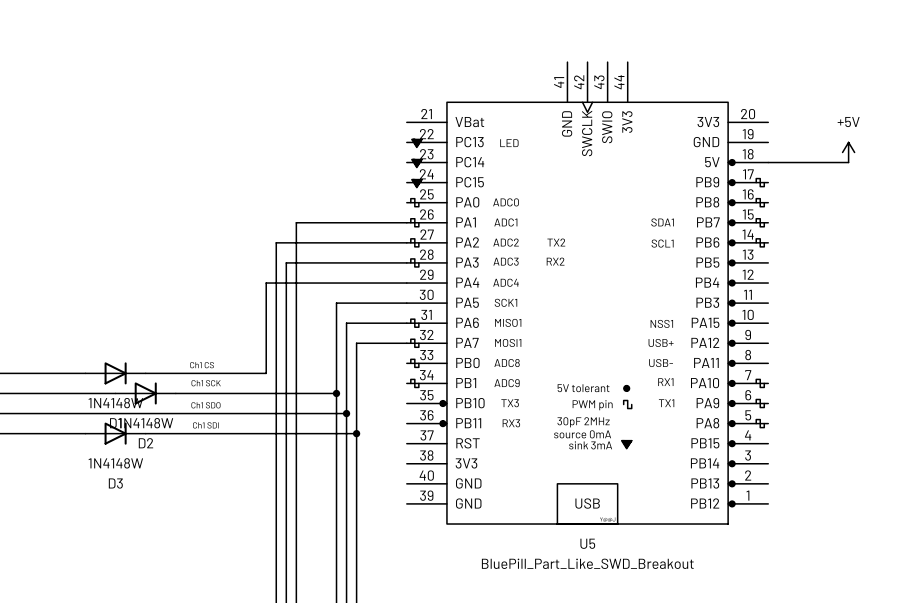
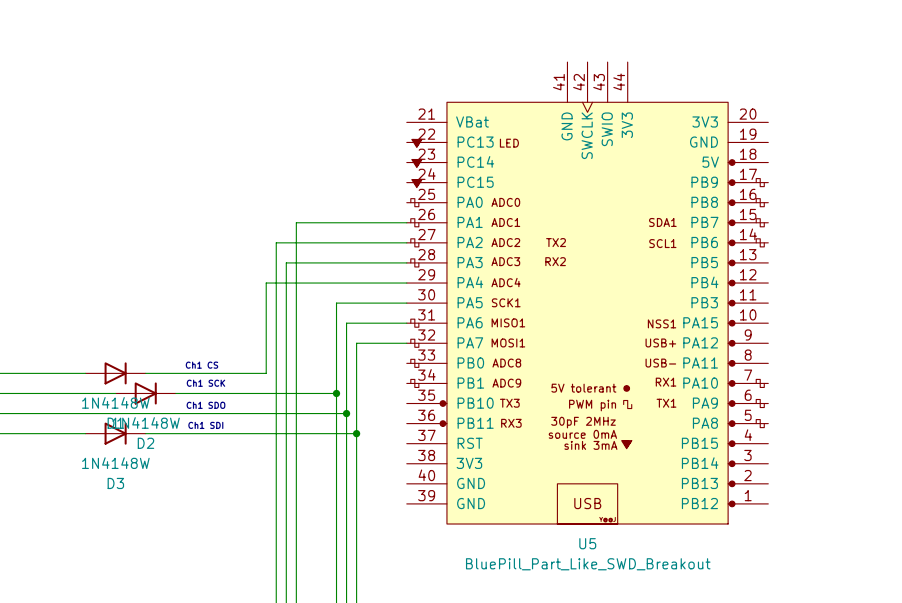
power symbol: +5V (848, 152) -> none
wire: (768, 162) (848, 162) -> none

